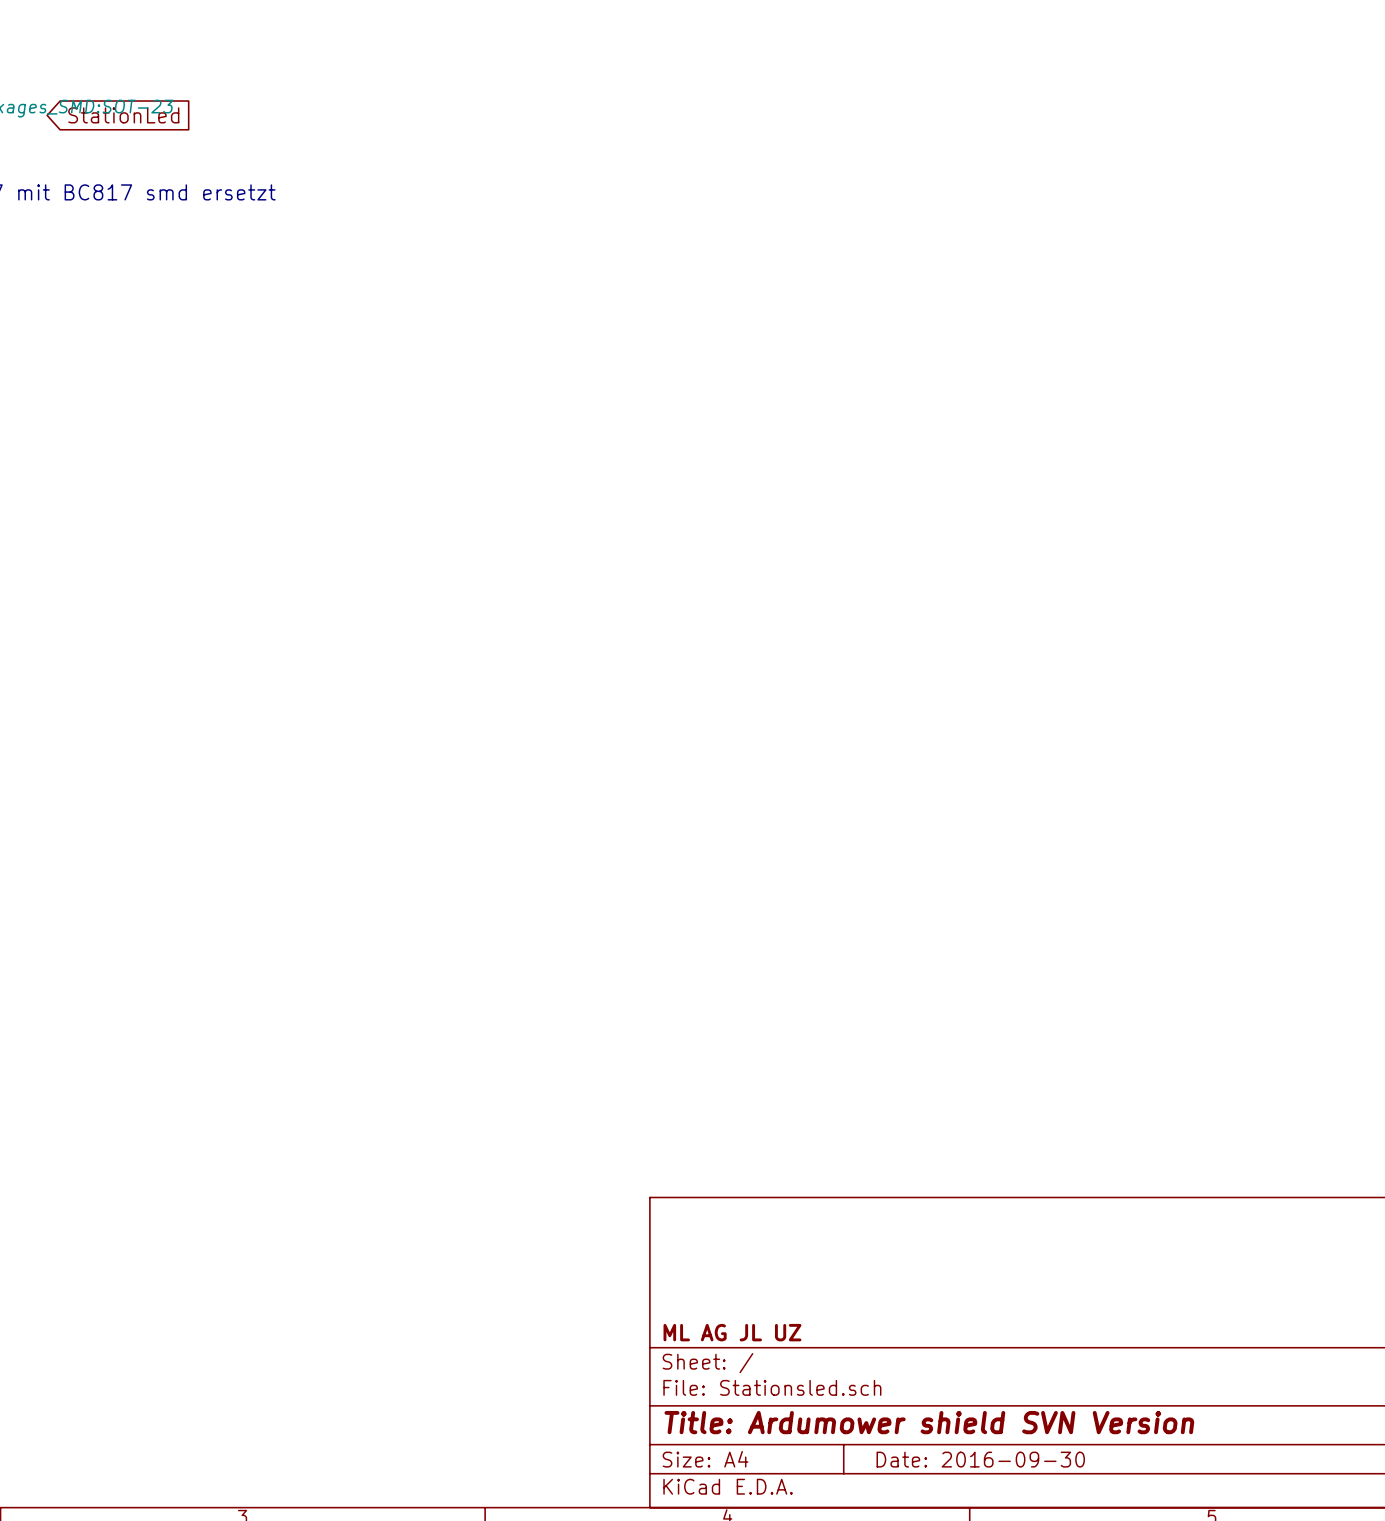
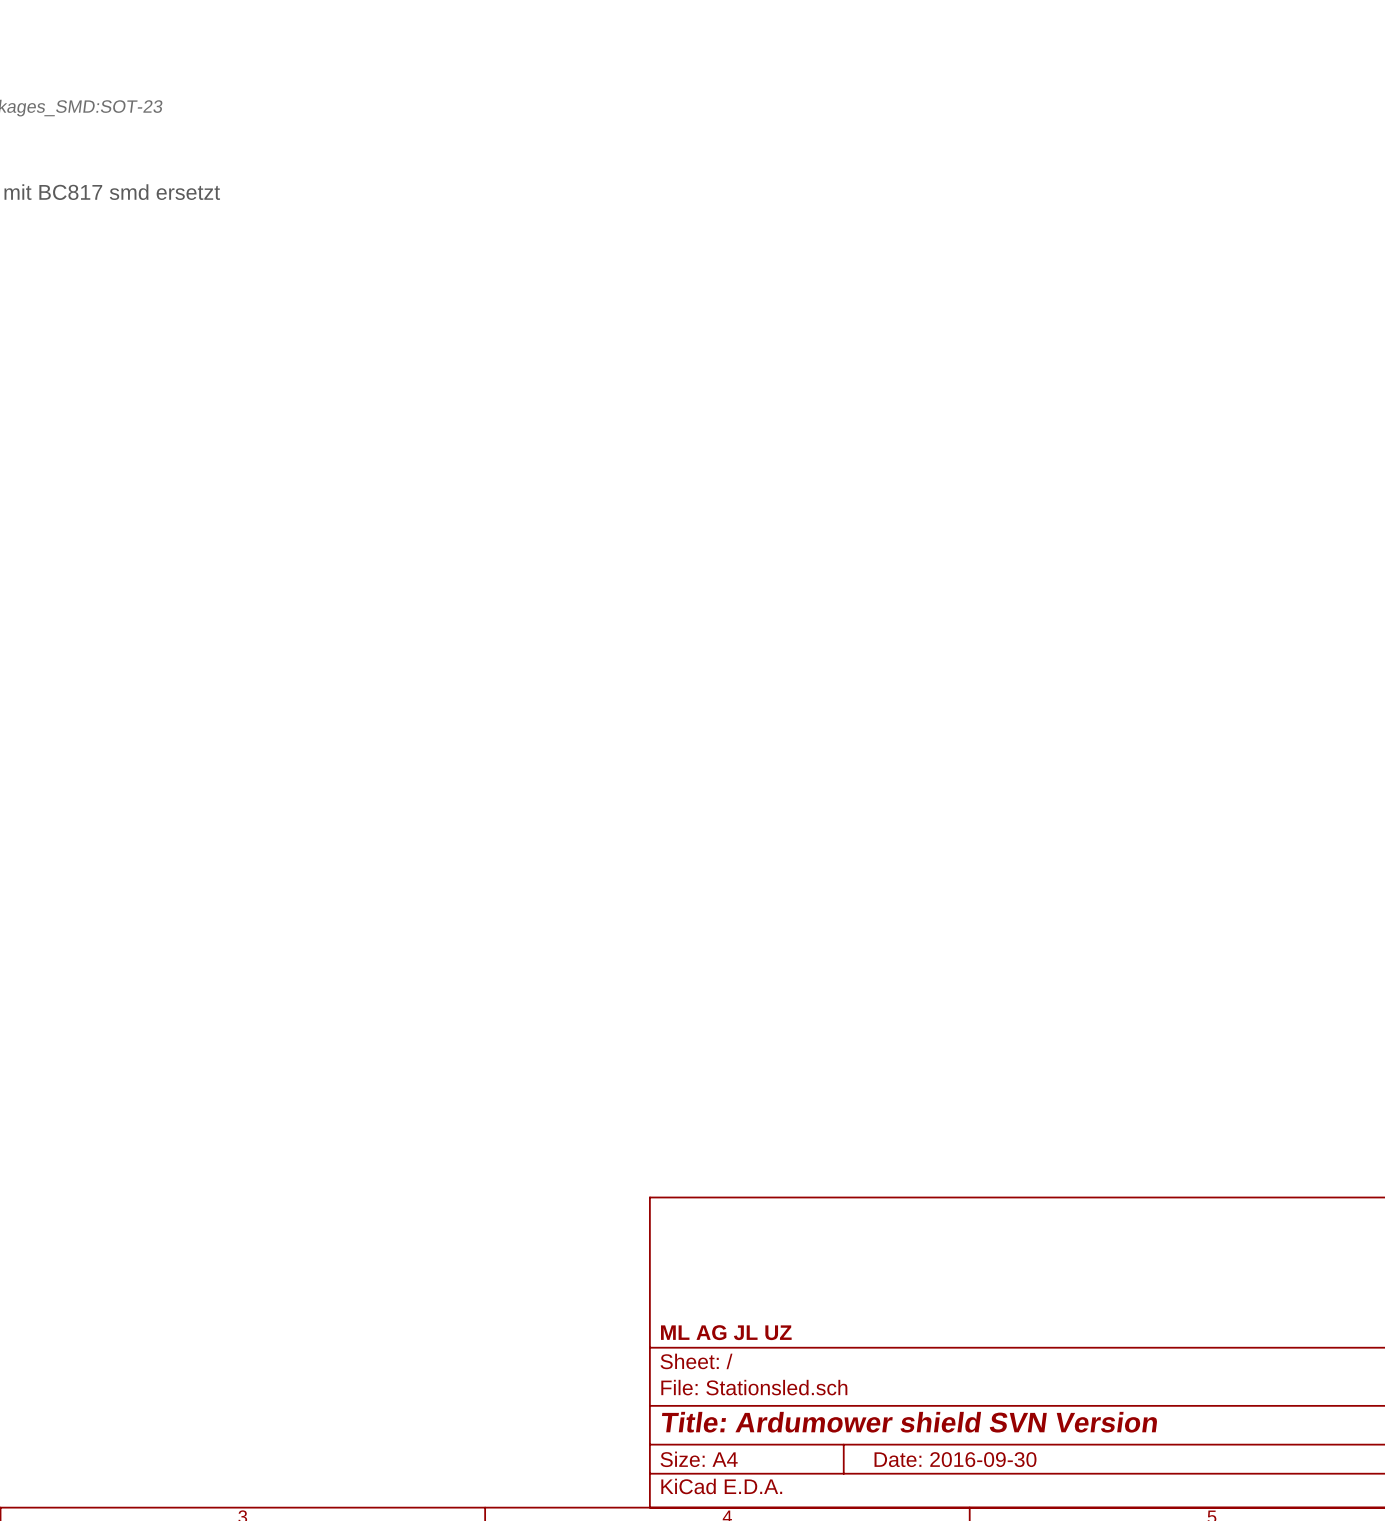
global label: StationLed (123, 115) -> none

